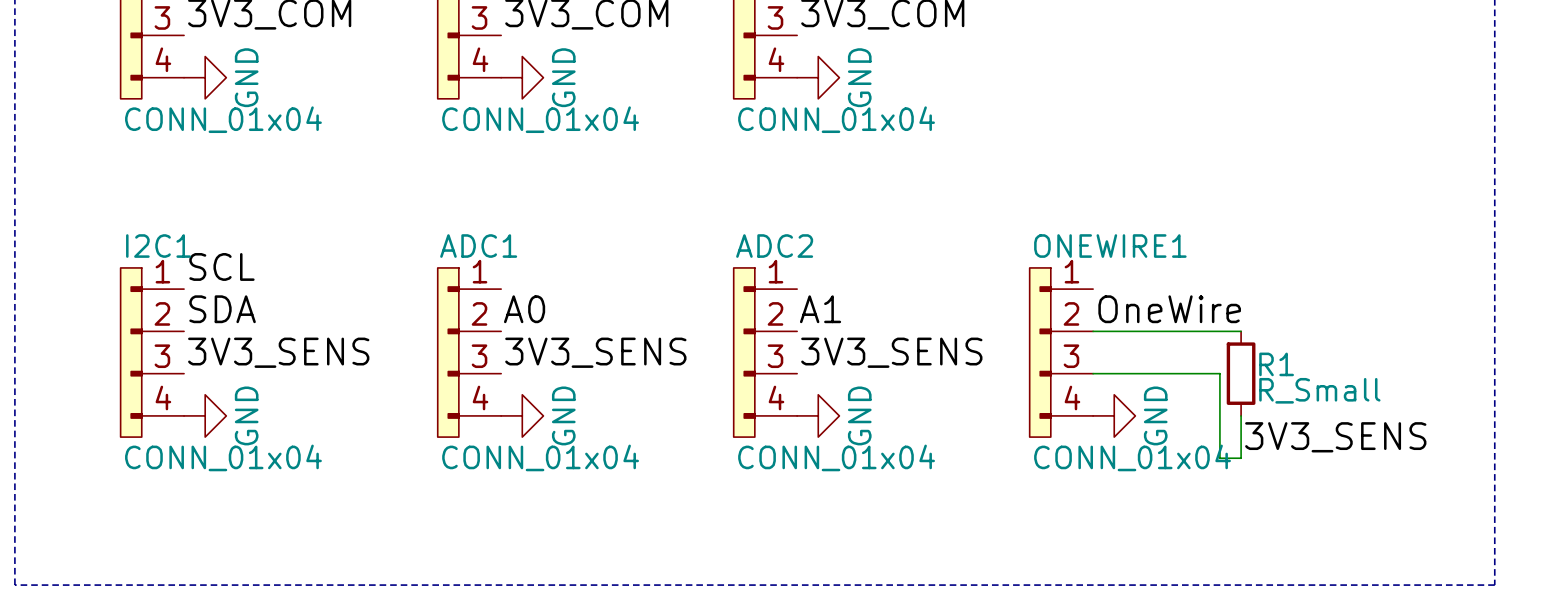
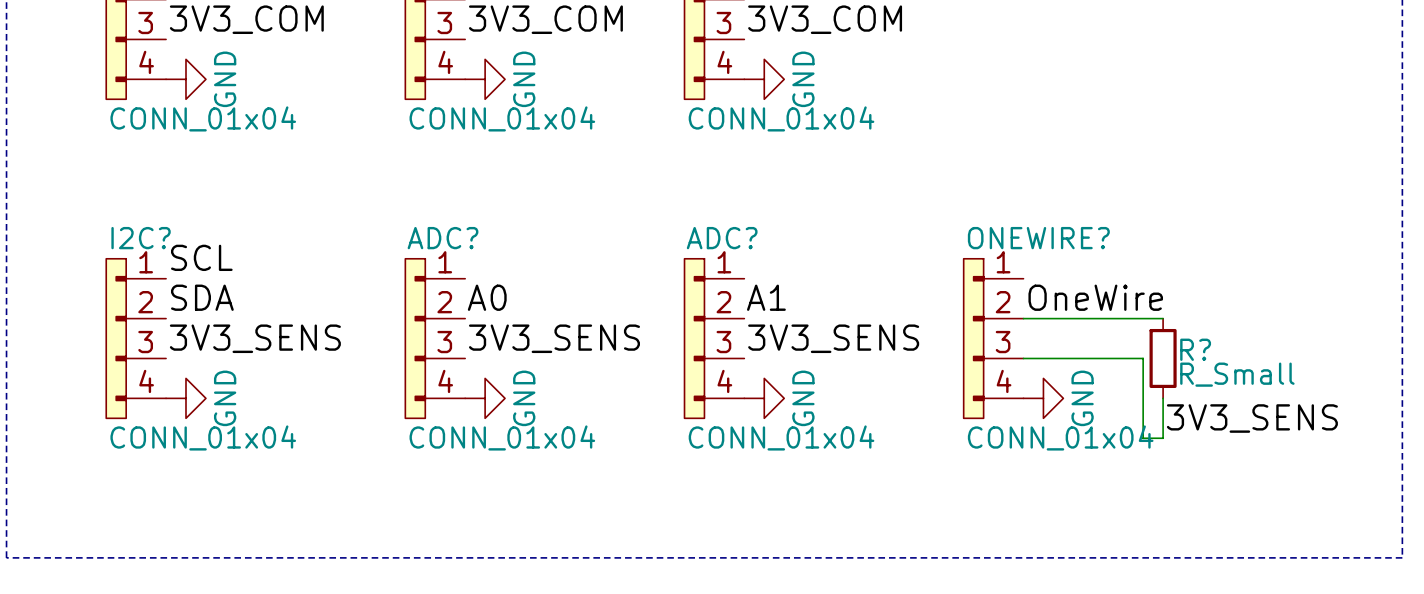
I2C1 name: I2C1 (158, 246) -> I2C? (141, 238)
ADC1 name: ADC1 (478, 246) -> ADC? (443, 238)
ADC2 name: ADC2 (774, 246) -> ADC? (722, 238)
ONEWIRE1 name: ONEWIRE1 (1110, 246) -> ONEWIRE? (1038, 238)
R1 name: R1 (1276, 364) -> R? (1195, 349)

